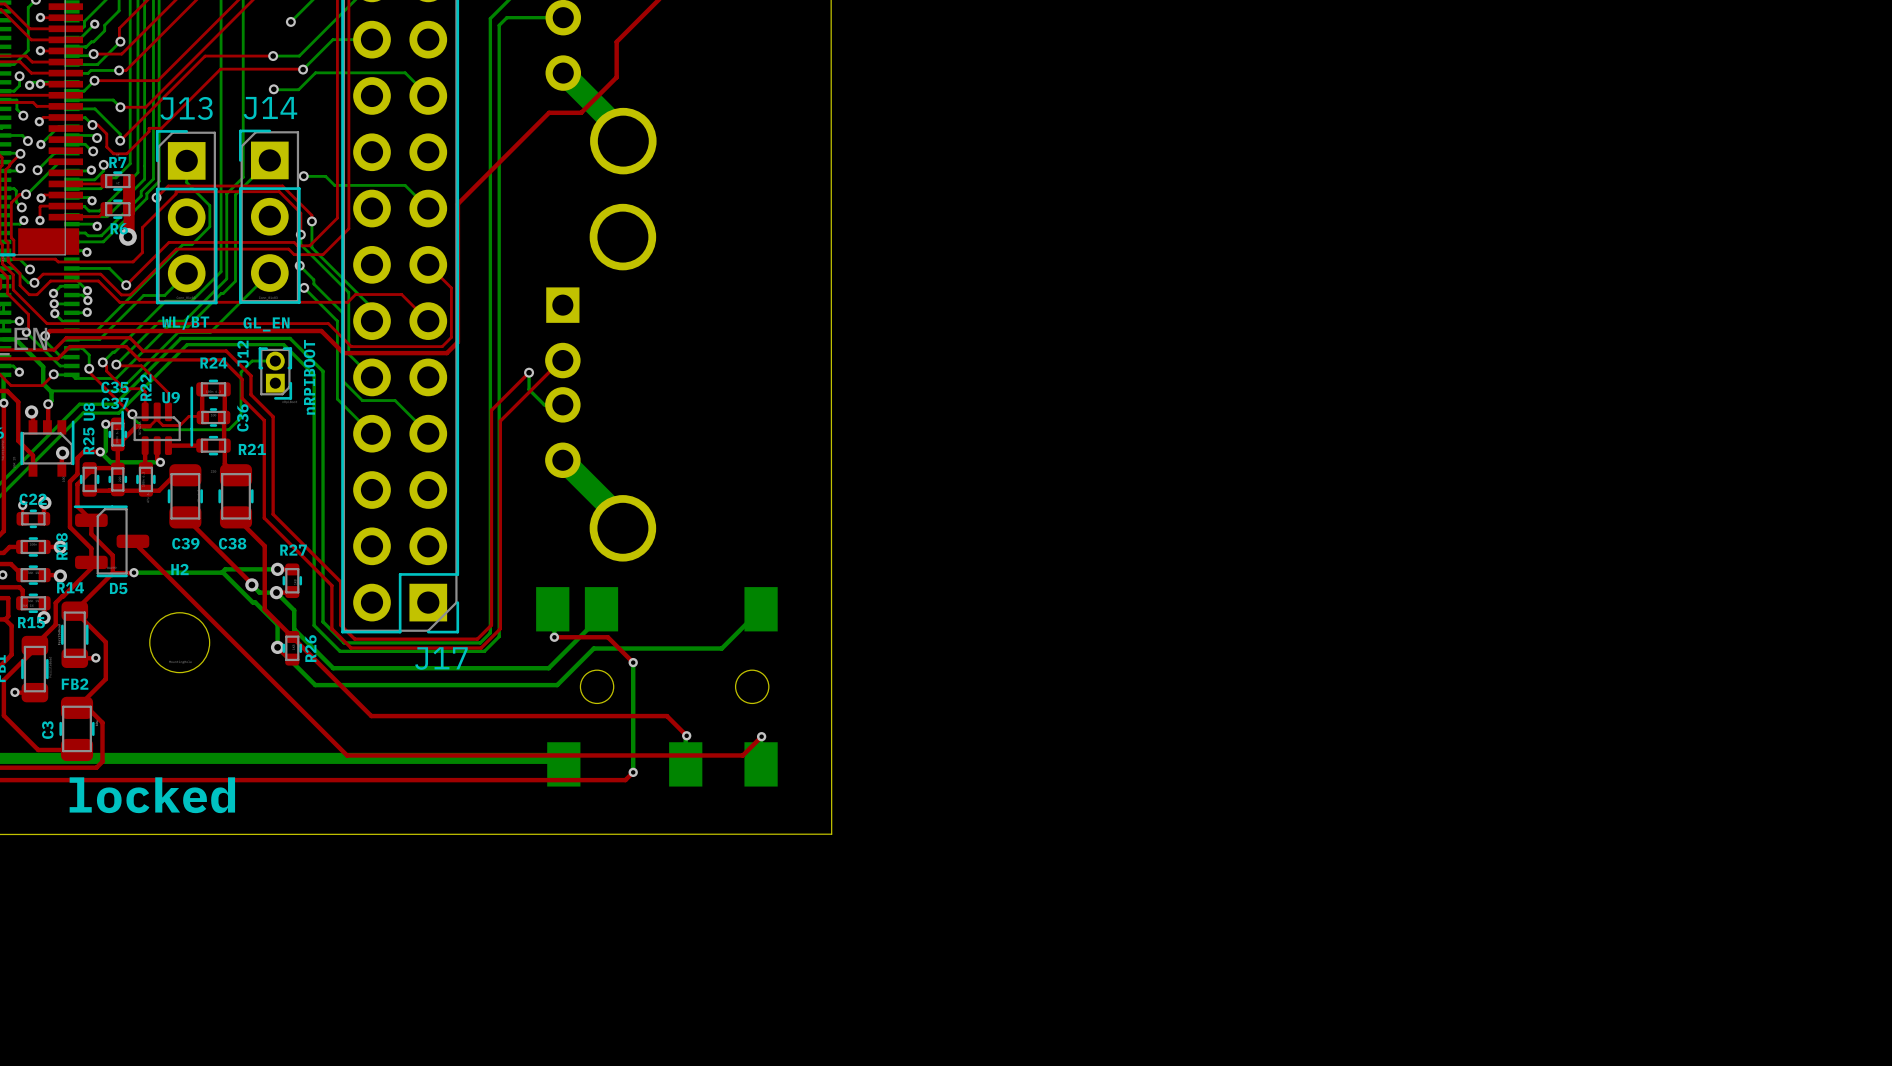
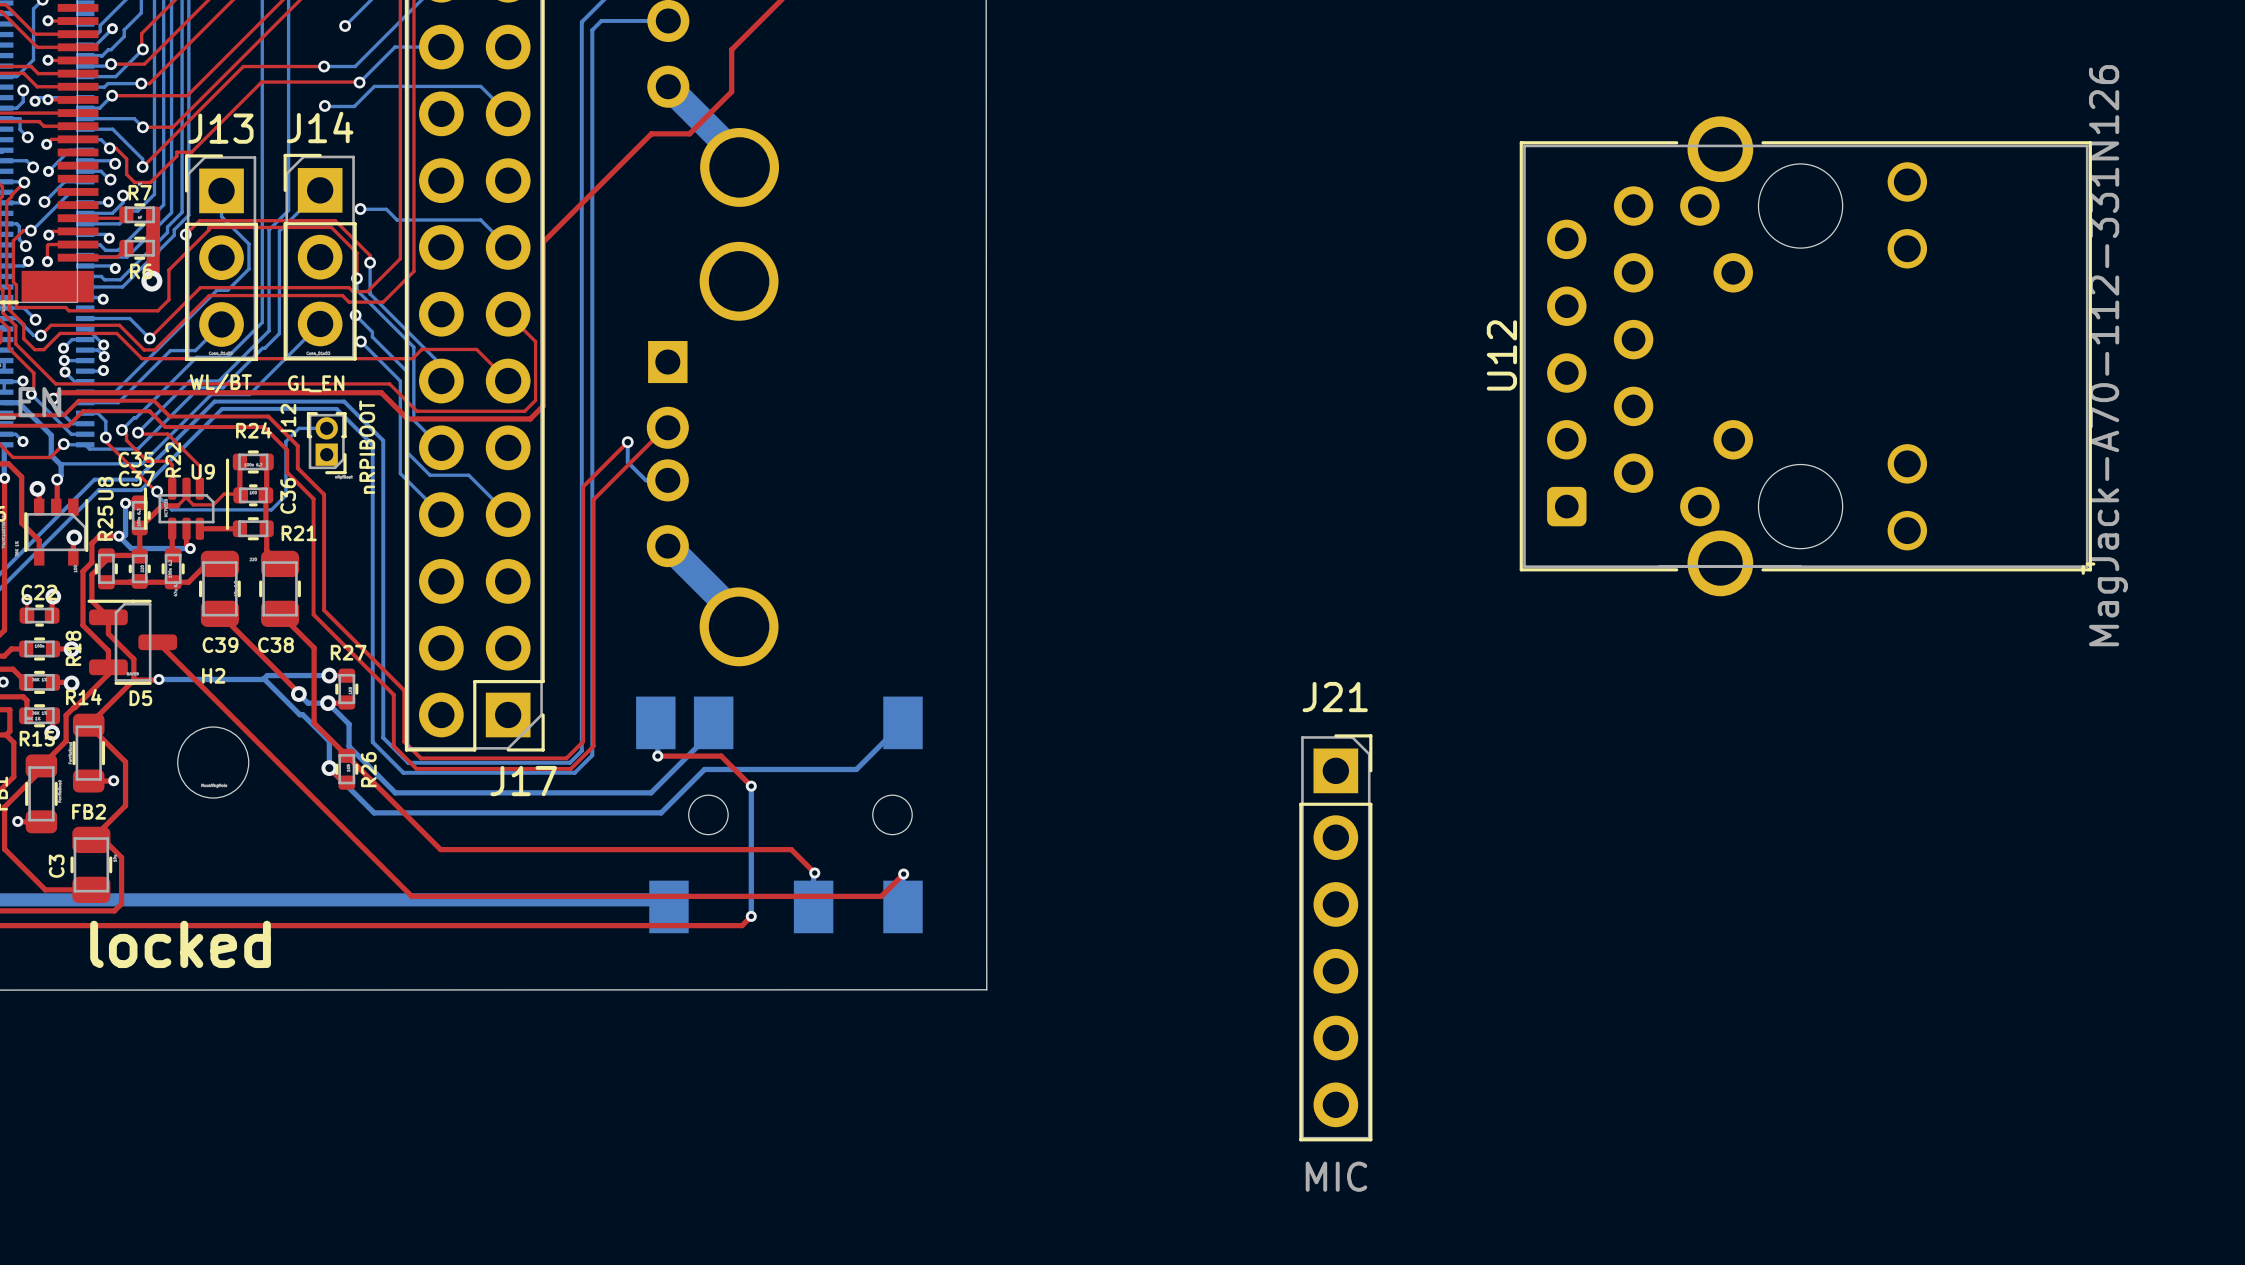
U12: none -> MagJack-A70-112-331N126 (1807, 356)
J21: none -> MIC (1335, 937)

